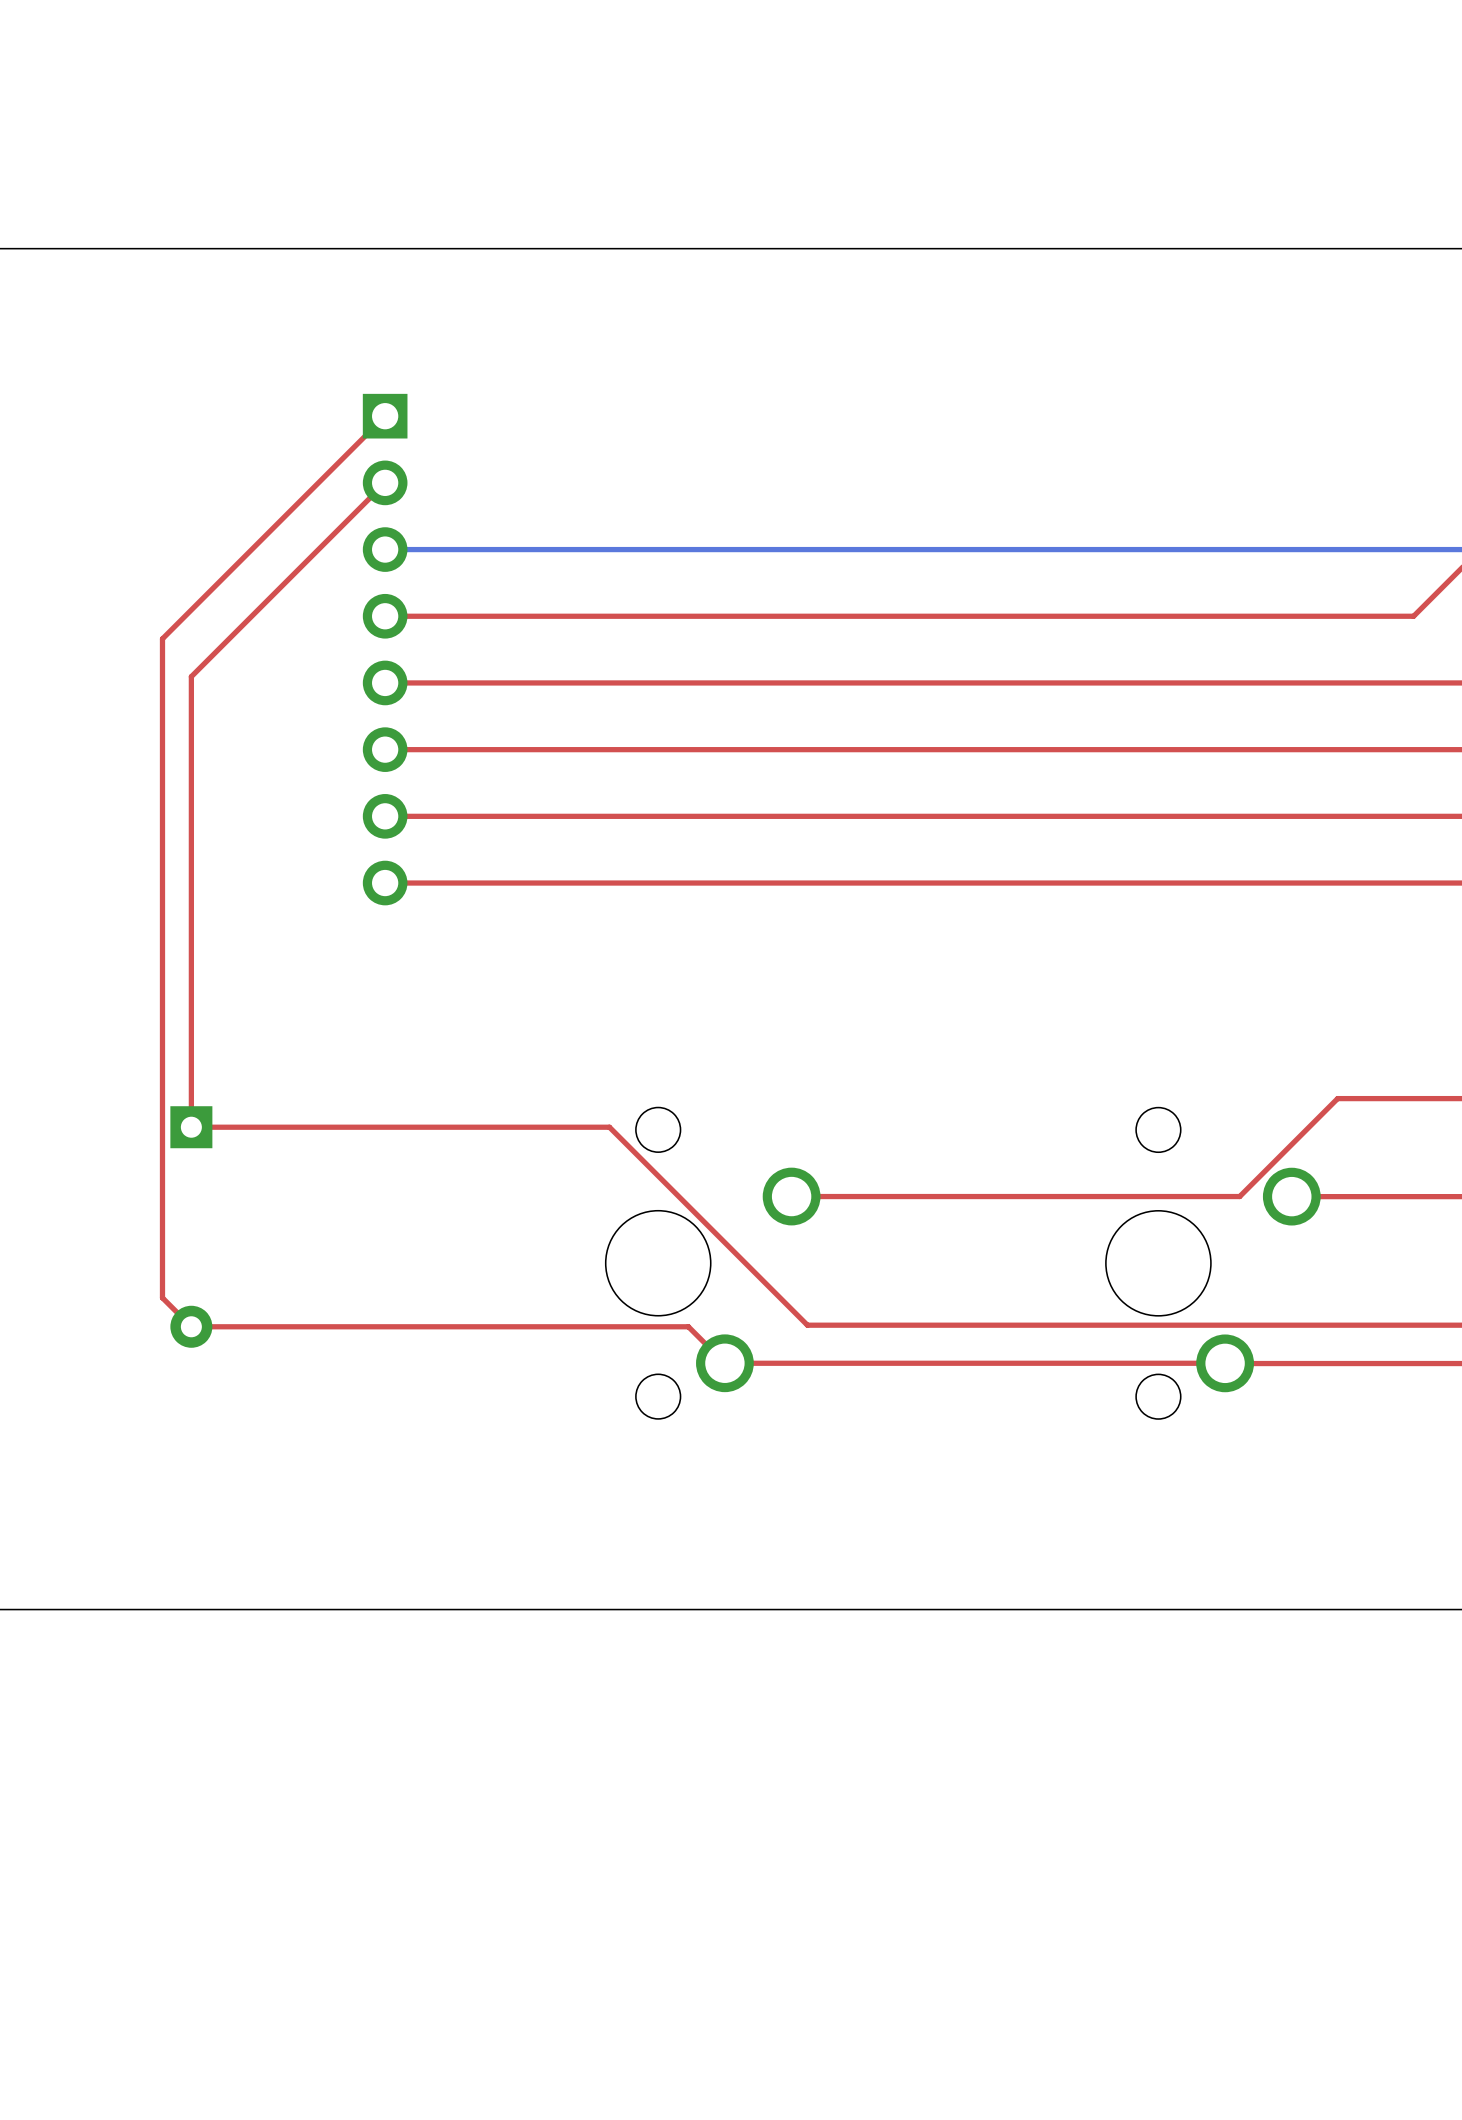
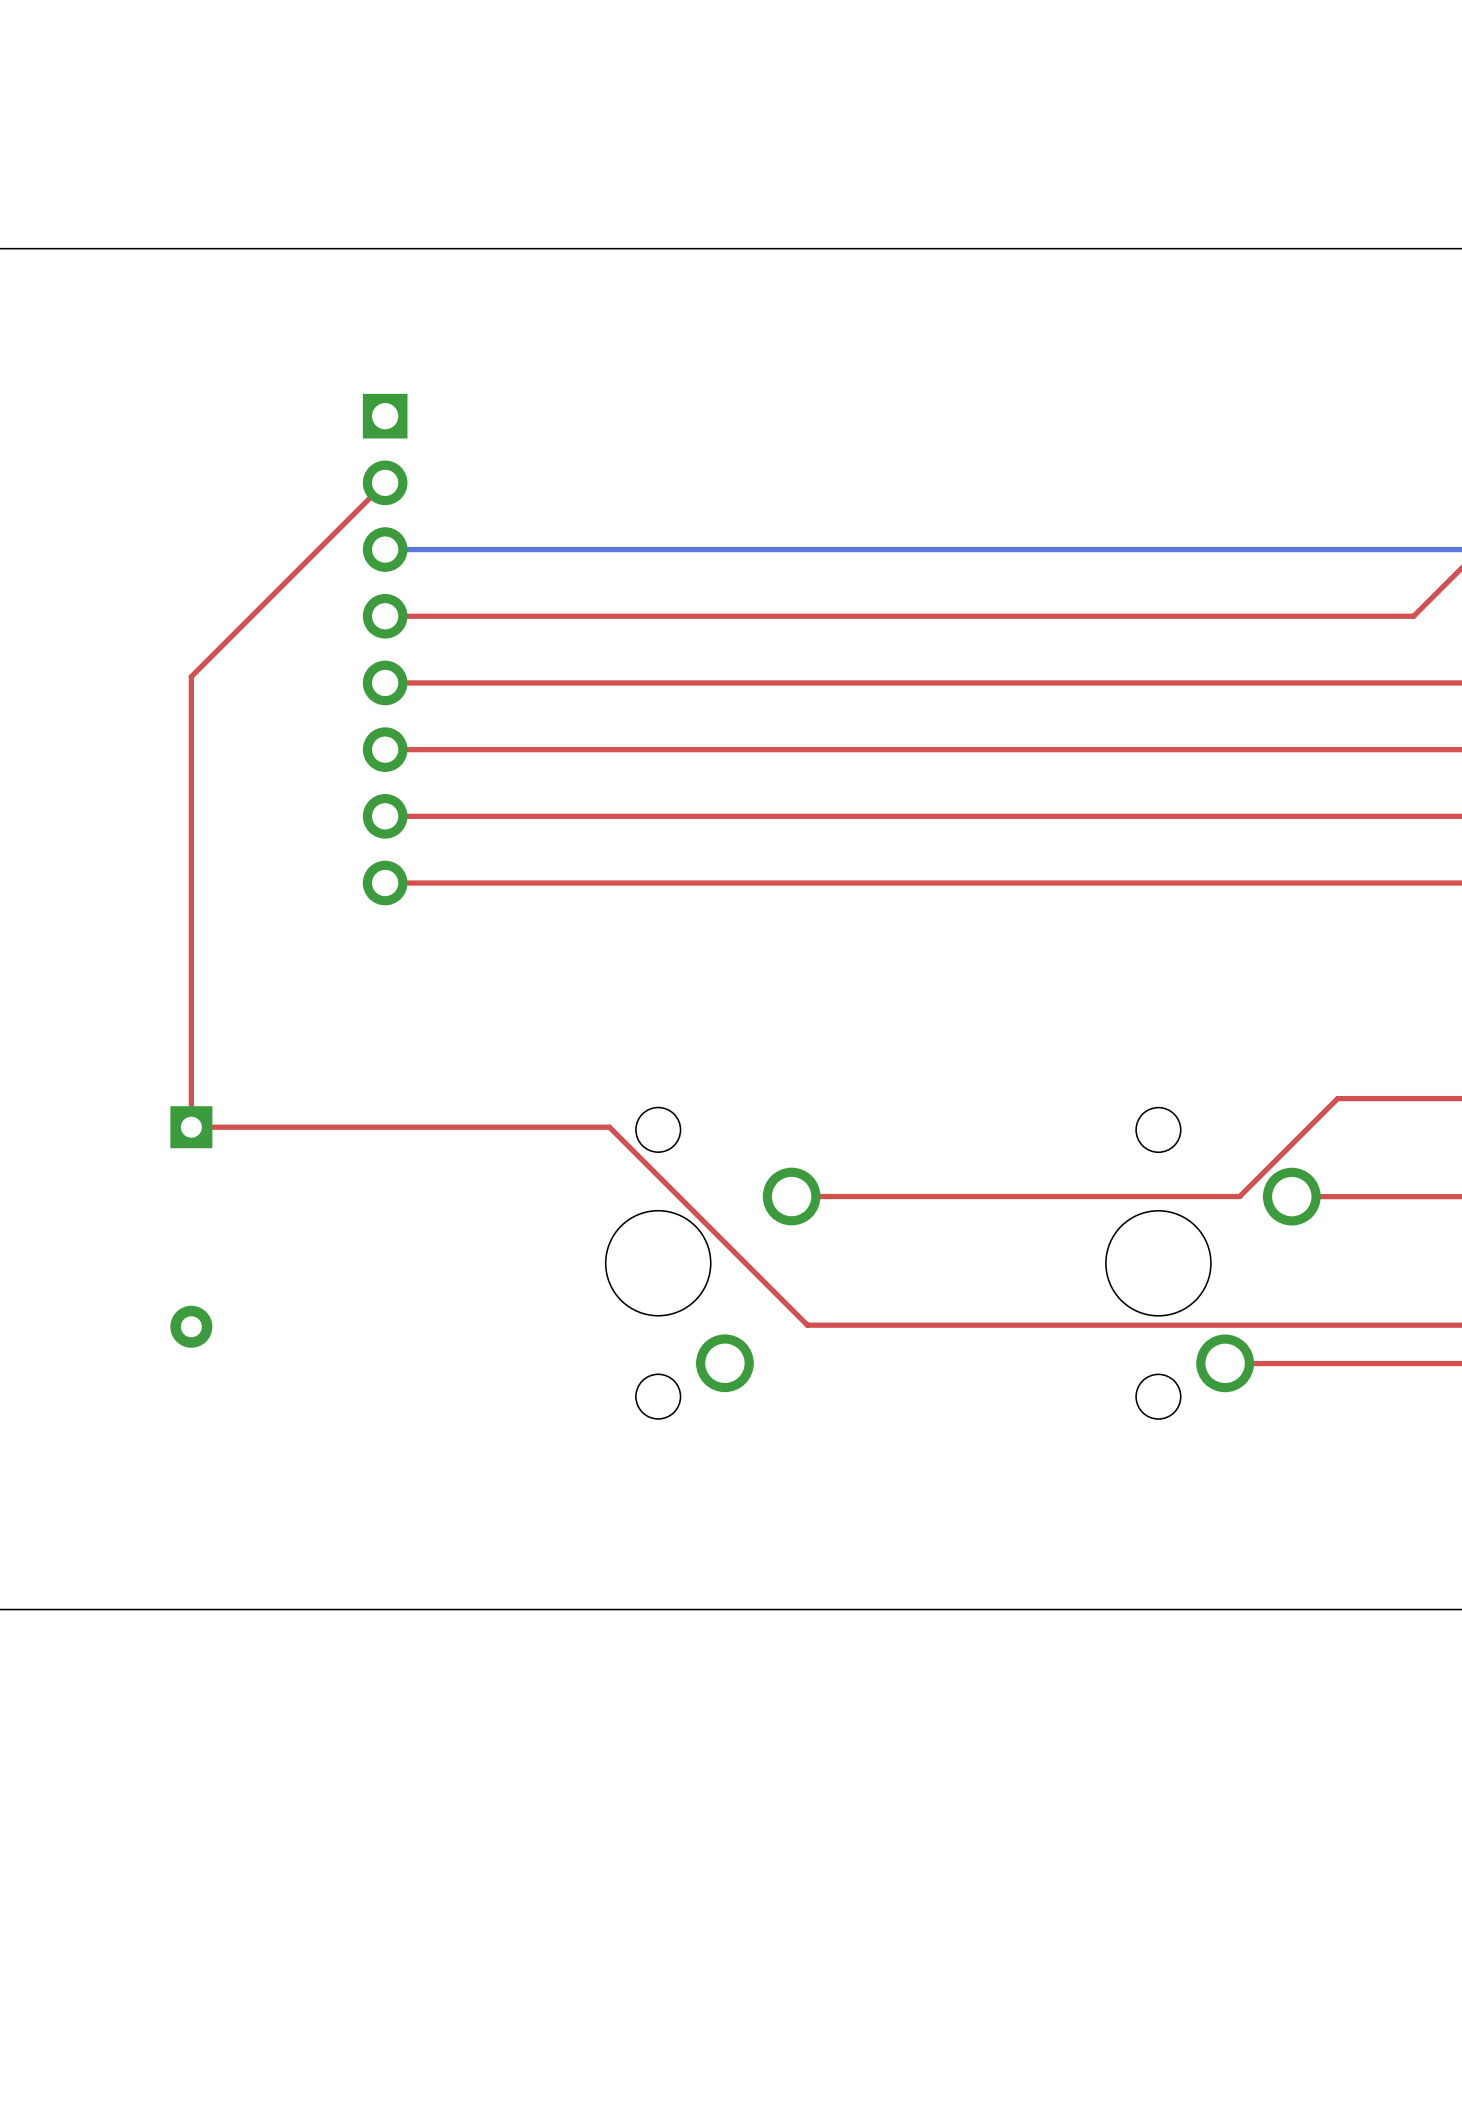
top track: (385, 416) (162, 638) (162, 1297) (191, 1326) (688, 1326) (724, 1363) (1232, 1363) -> none

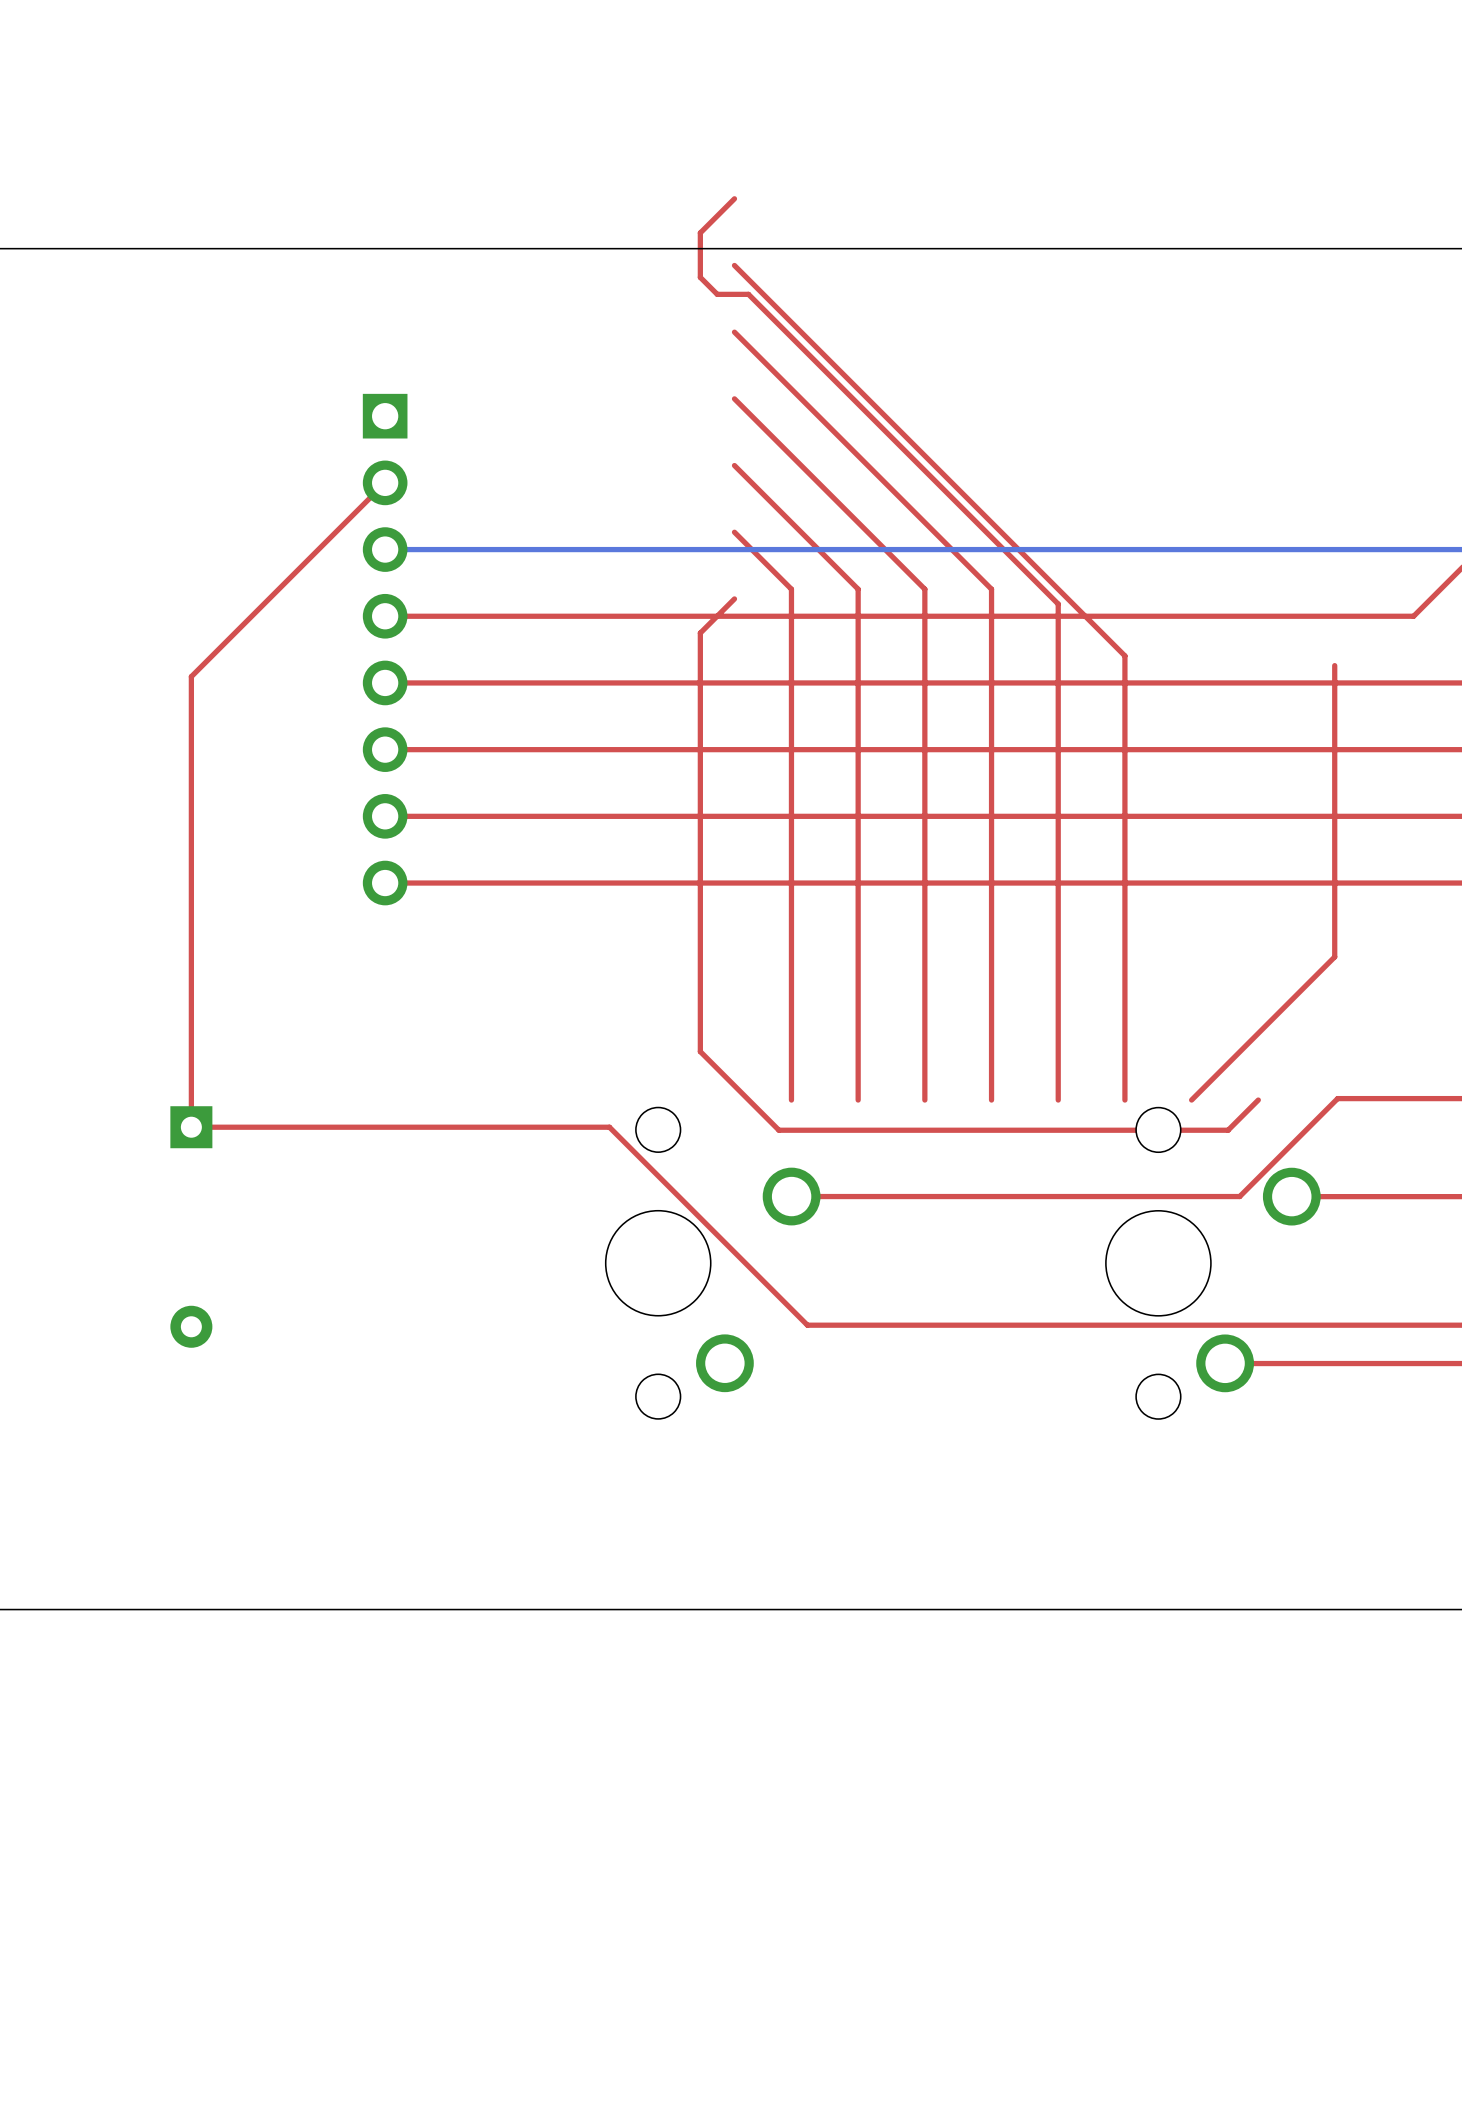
top track: none -> (734, 198) (700, 232) (700, 277) (717, 294) (748, 294) (1058, 604) (1058, 1100)
top track: none -> (734, 265) (1124, 655) (1124, 1100)
top track: none -> (734, 332) (991, 589) (991, 1100)
top track: none -> (734, 398) (924, 589) (924, 1100)
top track: none -> (734, 465) (858, 589) (858, 1100)
top track: none -> (734, 532) (791, 589) (791, 1100)
top track: none -> (734, 598) (700, 633) (700, 1051) (778, 1130) (1228, 1130) (1258, 1100)
top track: none -> (1334, 665) (1334, 956) (1191, 1100)

